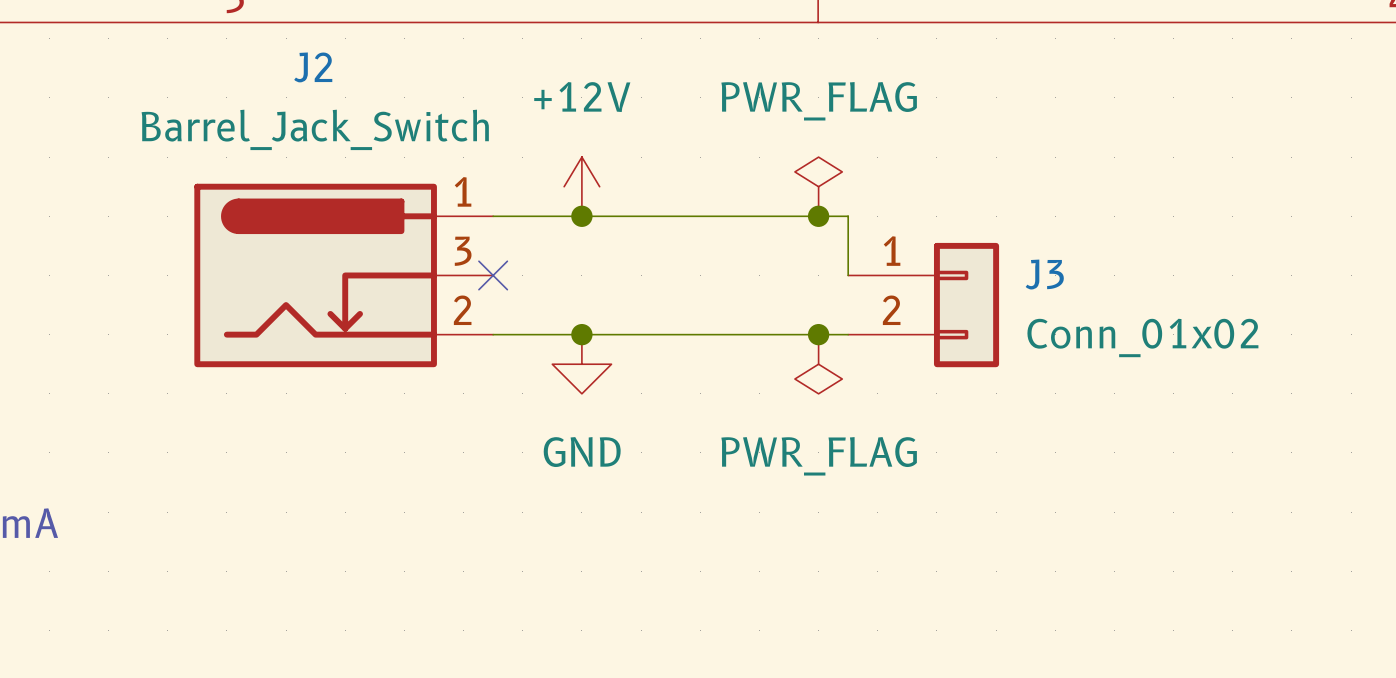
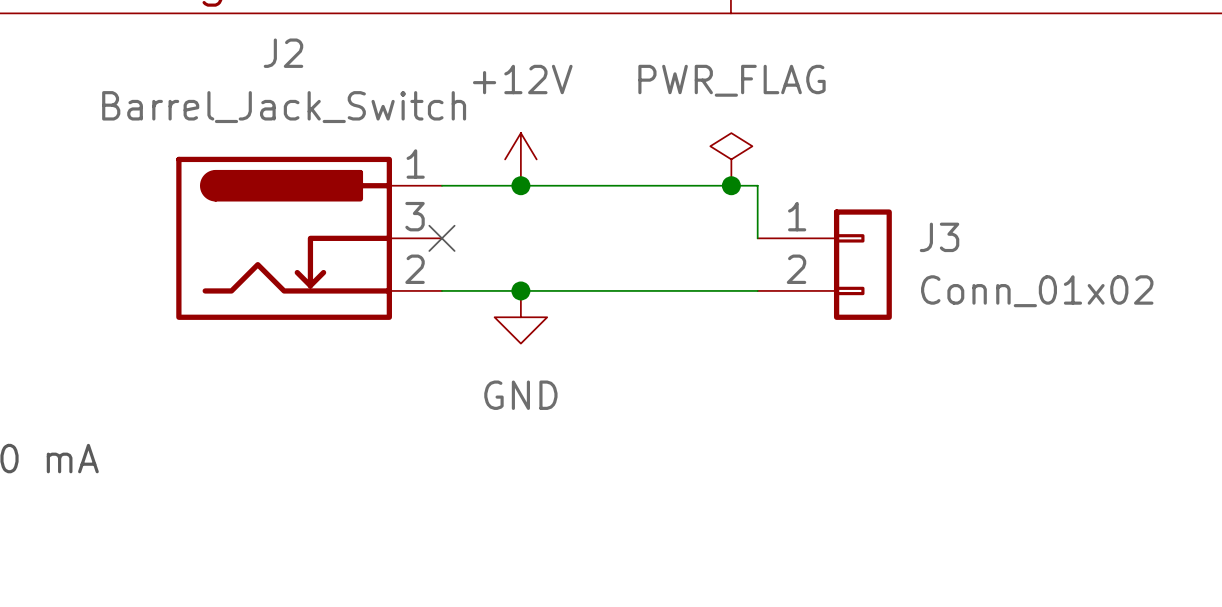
junction: (818, 334) -> none
power symbol: PWR_FLAG (818, 364) -> none

